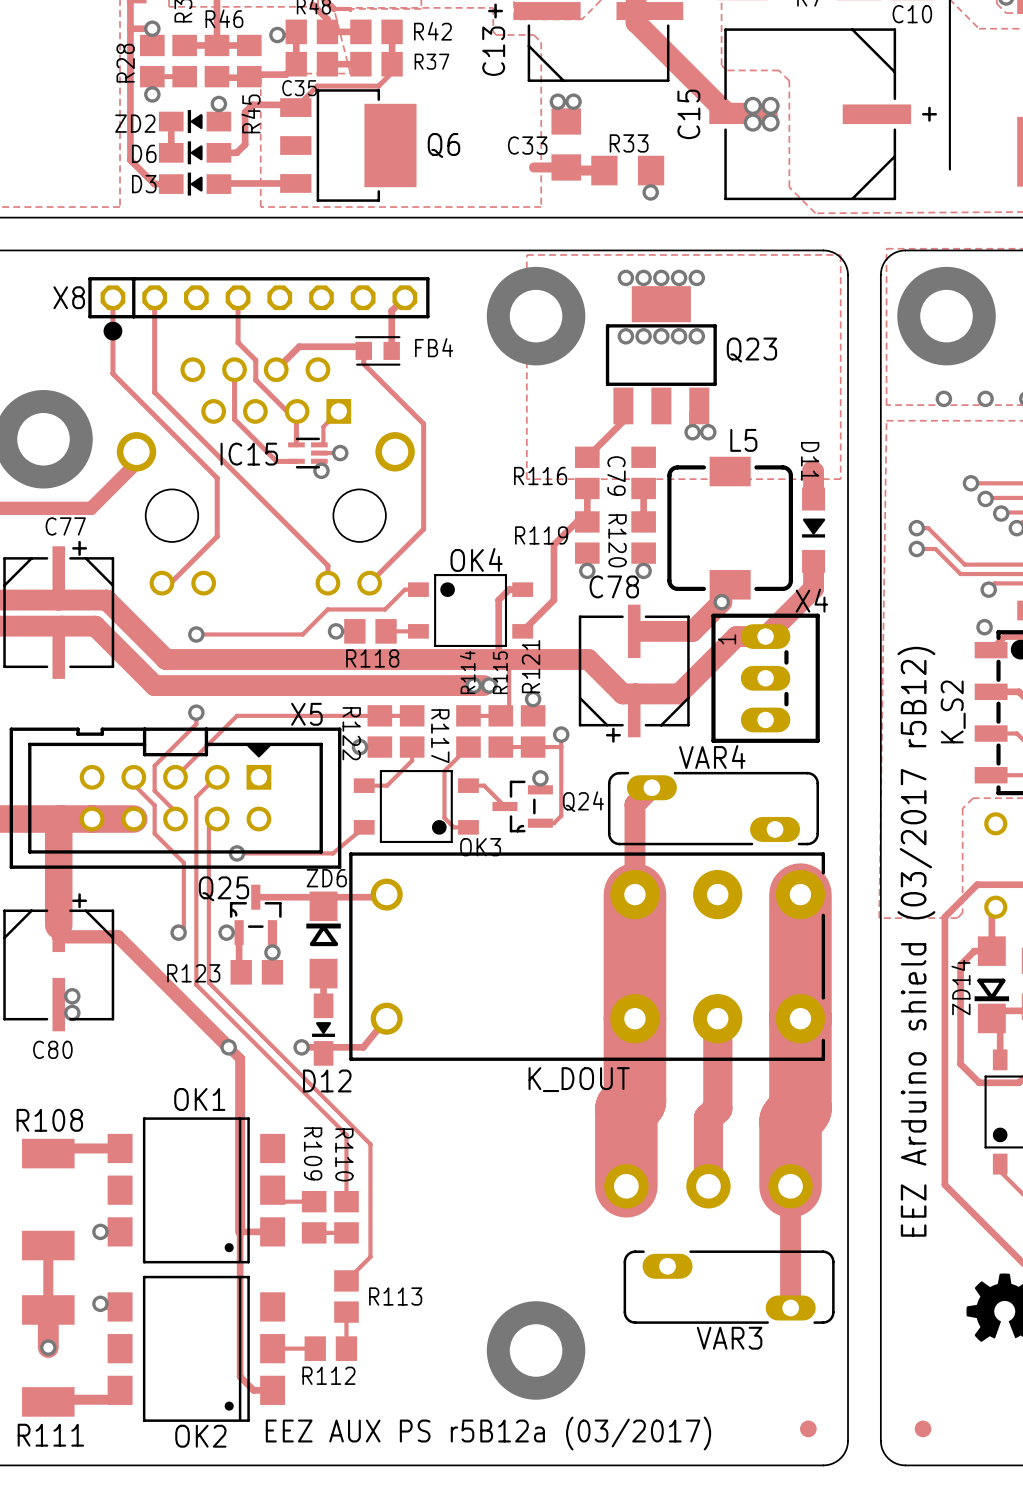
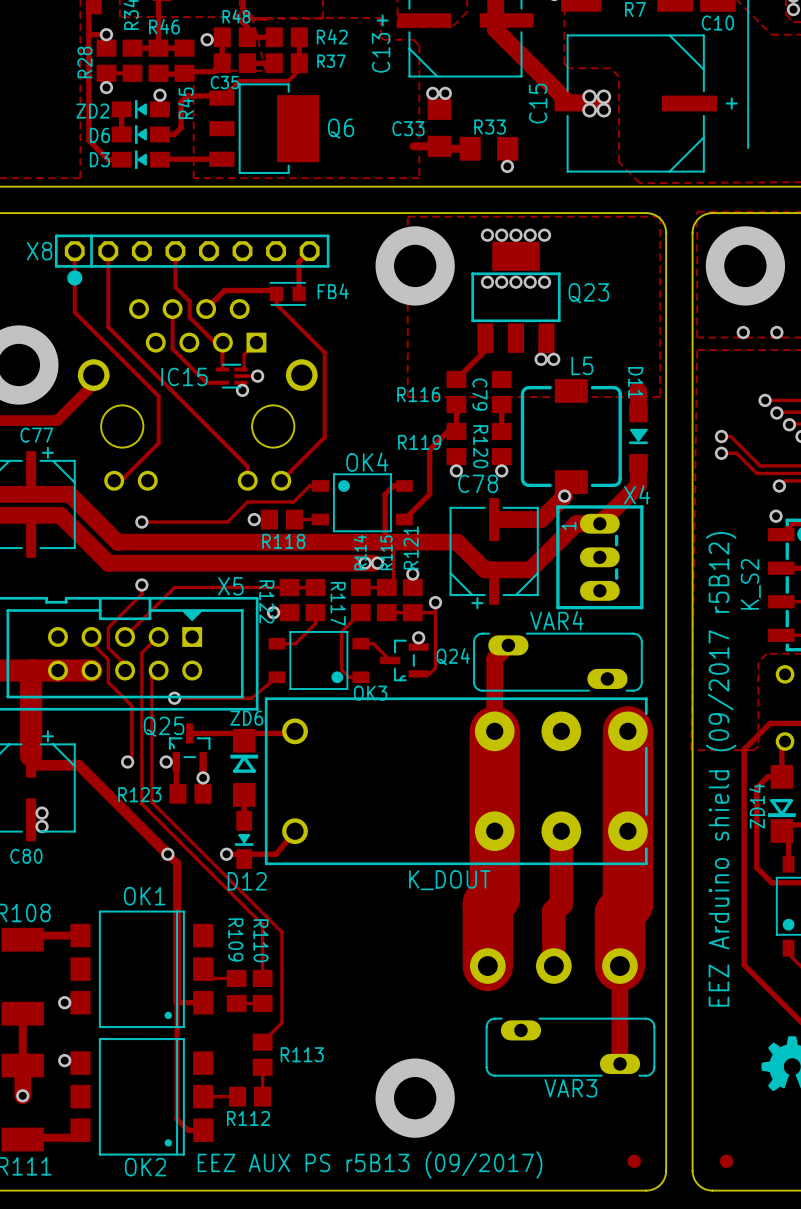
text: EEZ Arduino shield (03/2017 r5B12) (916, 941) -> EEZ Arduino shield (09/2017 r5B12) (721, 769)
text: EEZ AUX PS r5B12a (03/2017) (488, 1433) -> EEZ AUX PS r5B13 (09/2017) (370, 1164)

